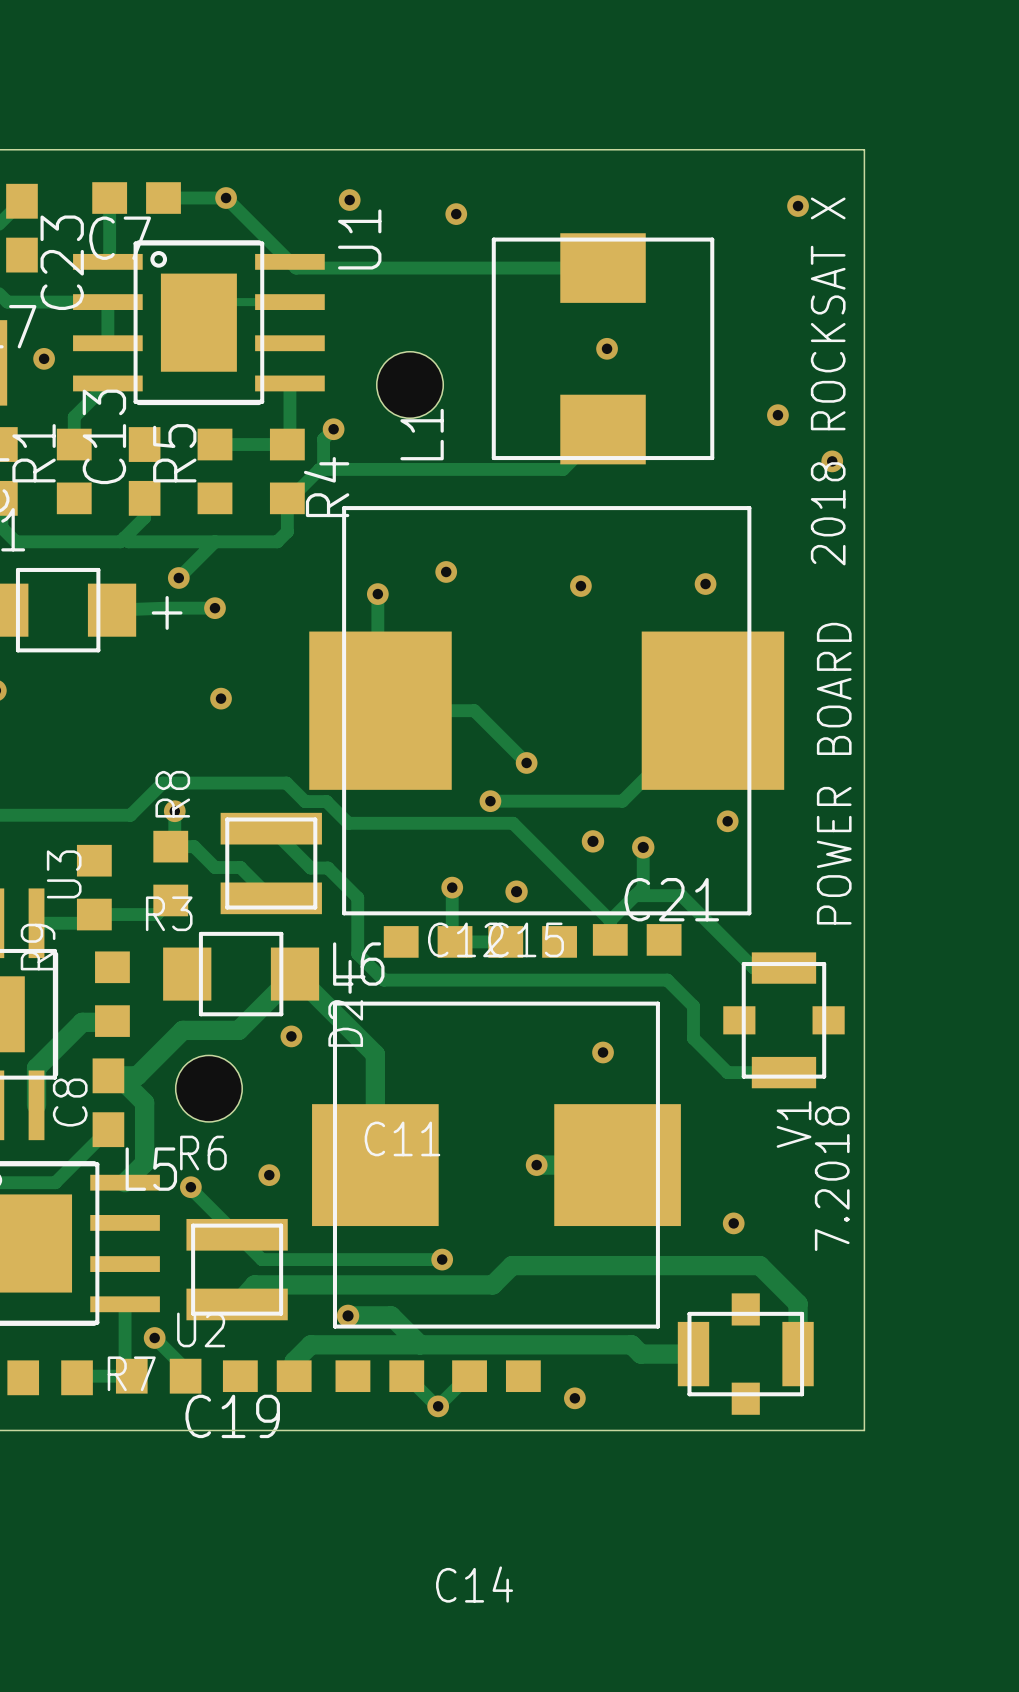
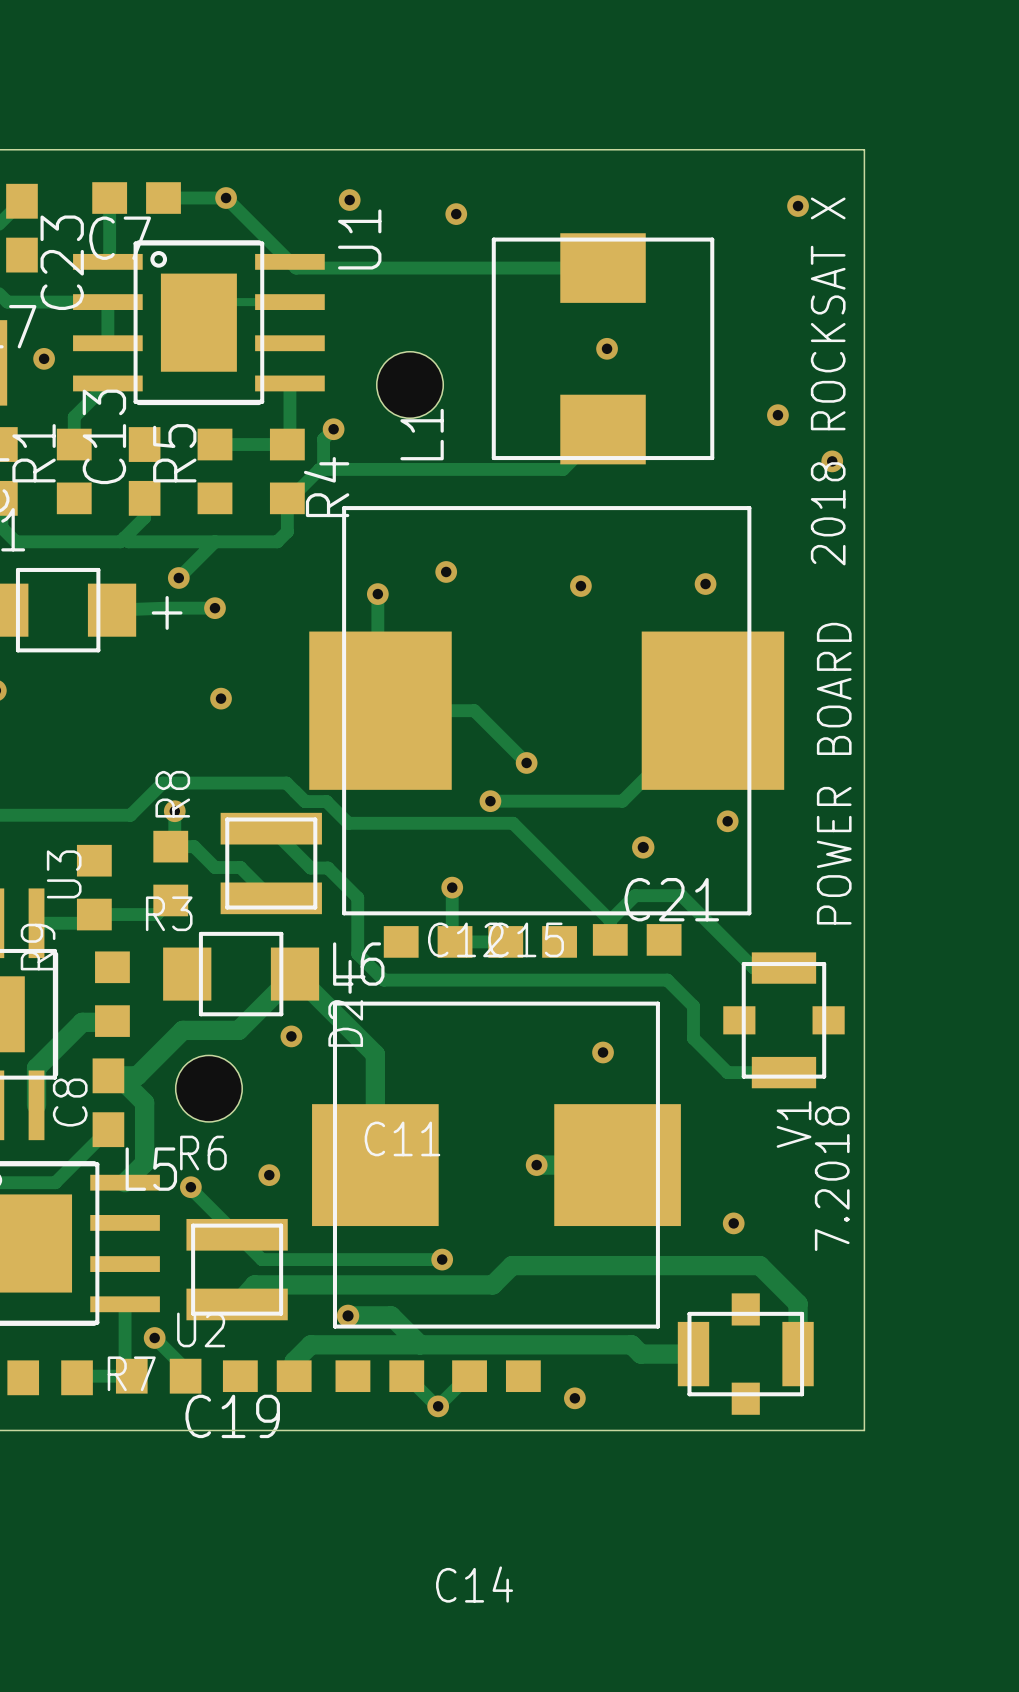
via: (592, 841) -> none
track: (643, 847) (643, 887) (635, 895) -> none
via: (516, 891) -> none

